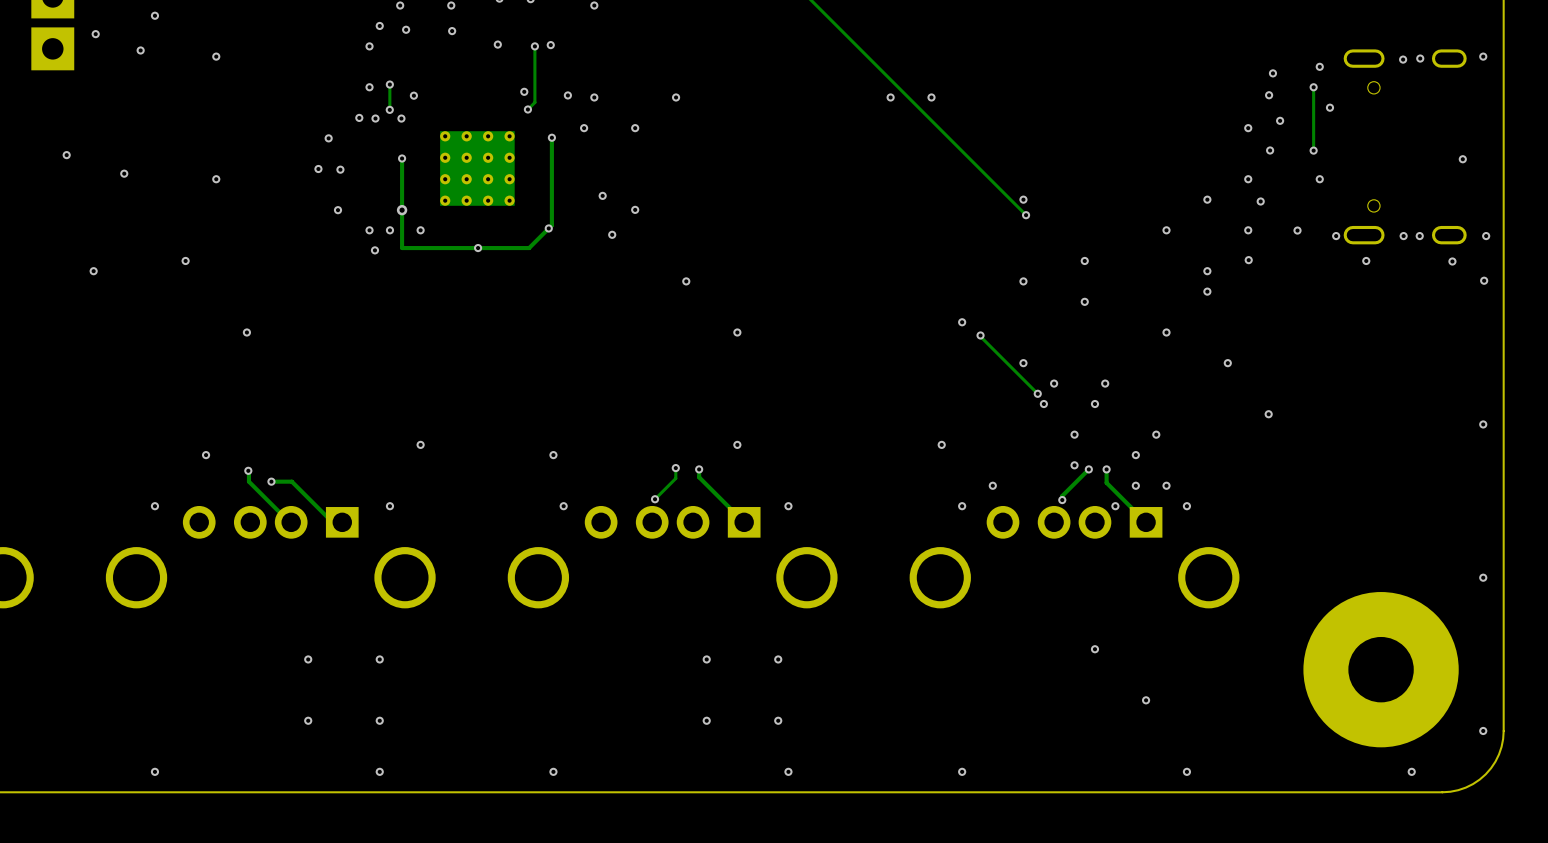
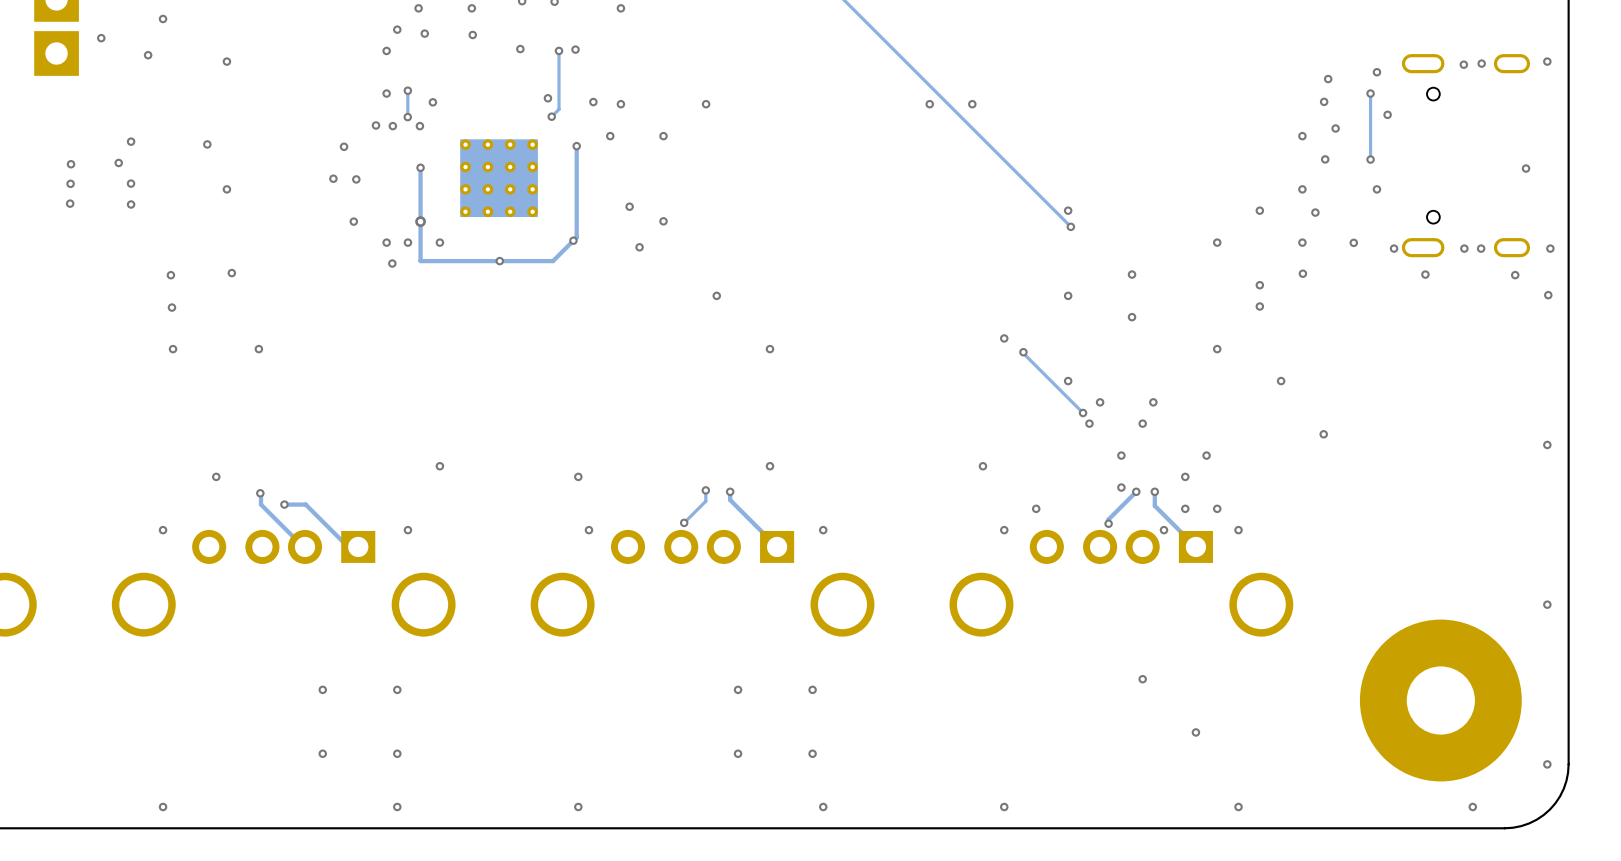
via: none -> (131, 141)
via: none -> (207, 144)
via: none -> (118, 162)
via: none -> (70, 183)
via: none -> (70, 203)
via: none -> (131, 204)
via: none -> (231, 273)
via: (185, 260) -> none
via: none -> (170, 275)
via: (93, 271) -> none
via: none -> (171, 307)
via: none -> (173, 349)

